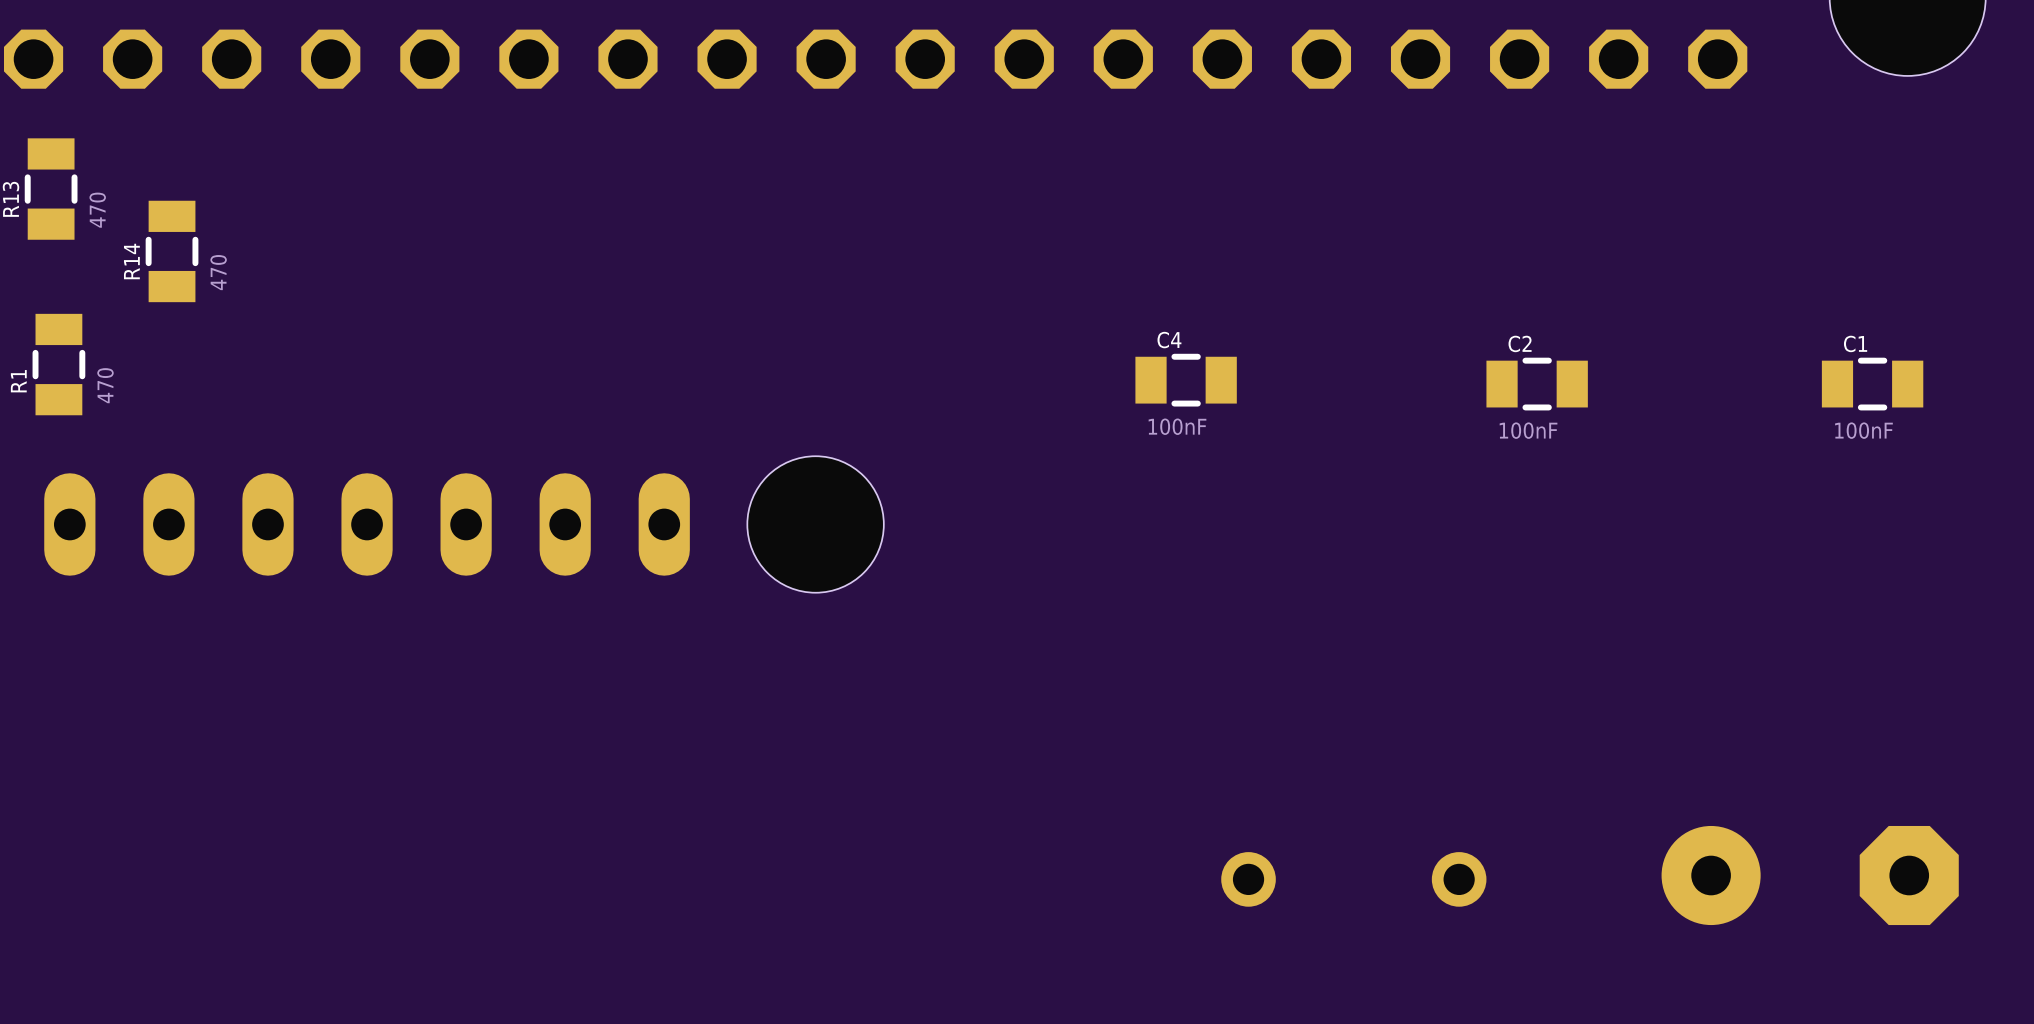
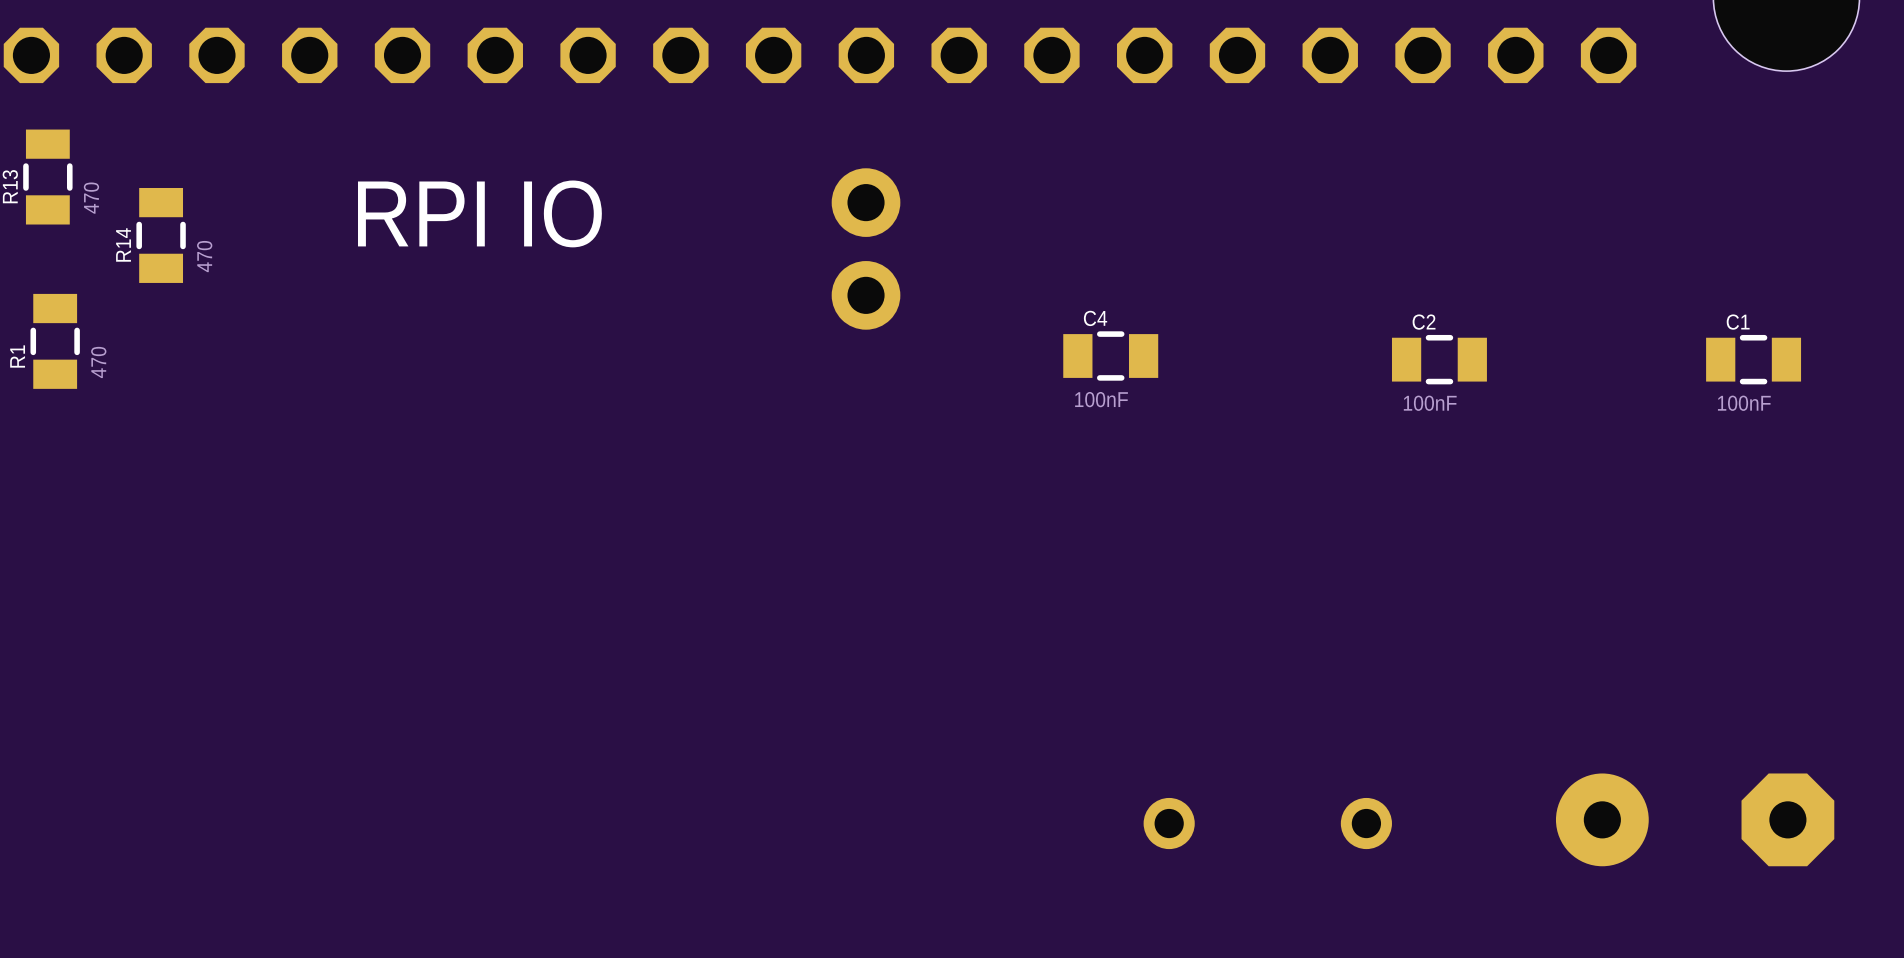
text: none -> RPI IO (479, 213)
part: none -> (866, 248)
part: (367, 524) -> none
hole: (815, 524) -> none

